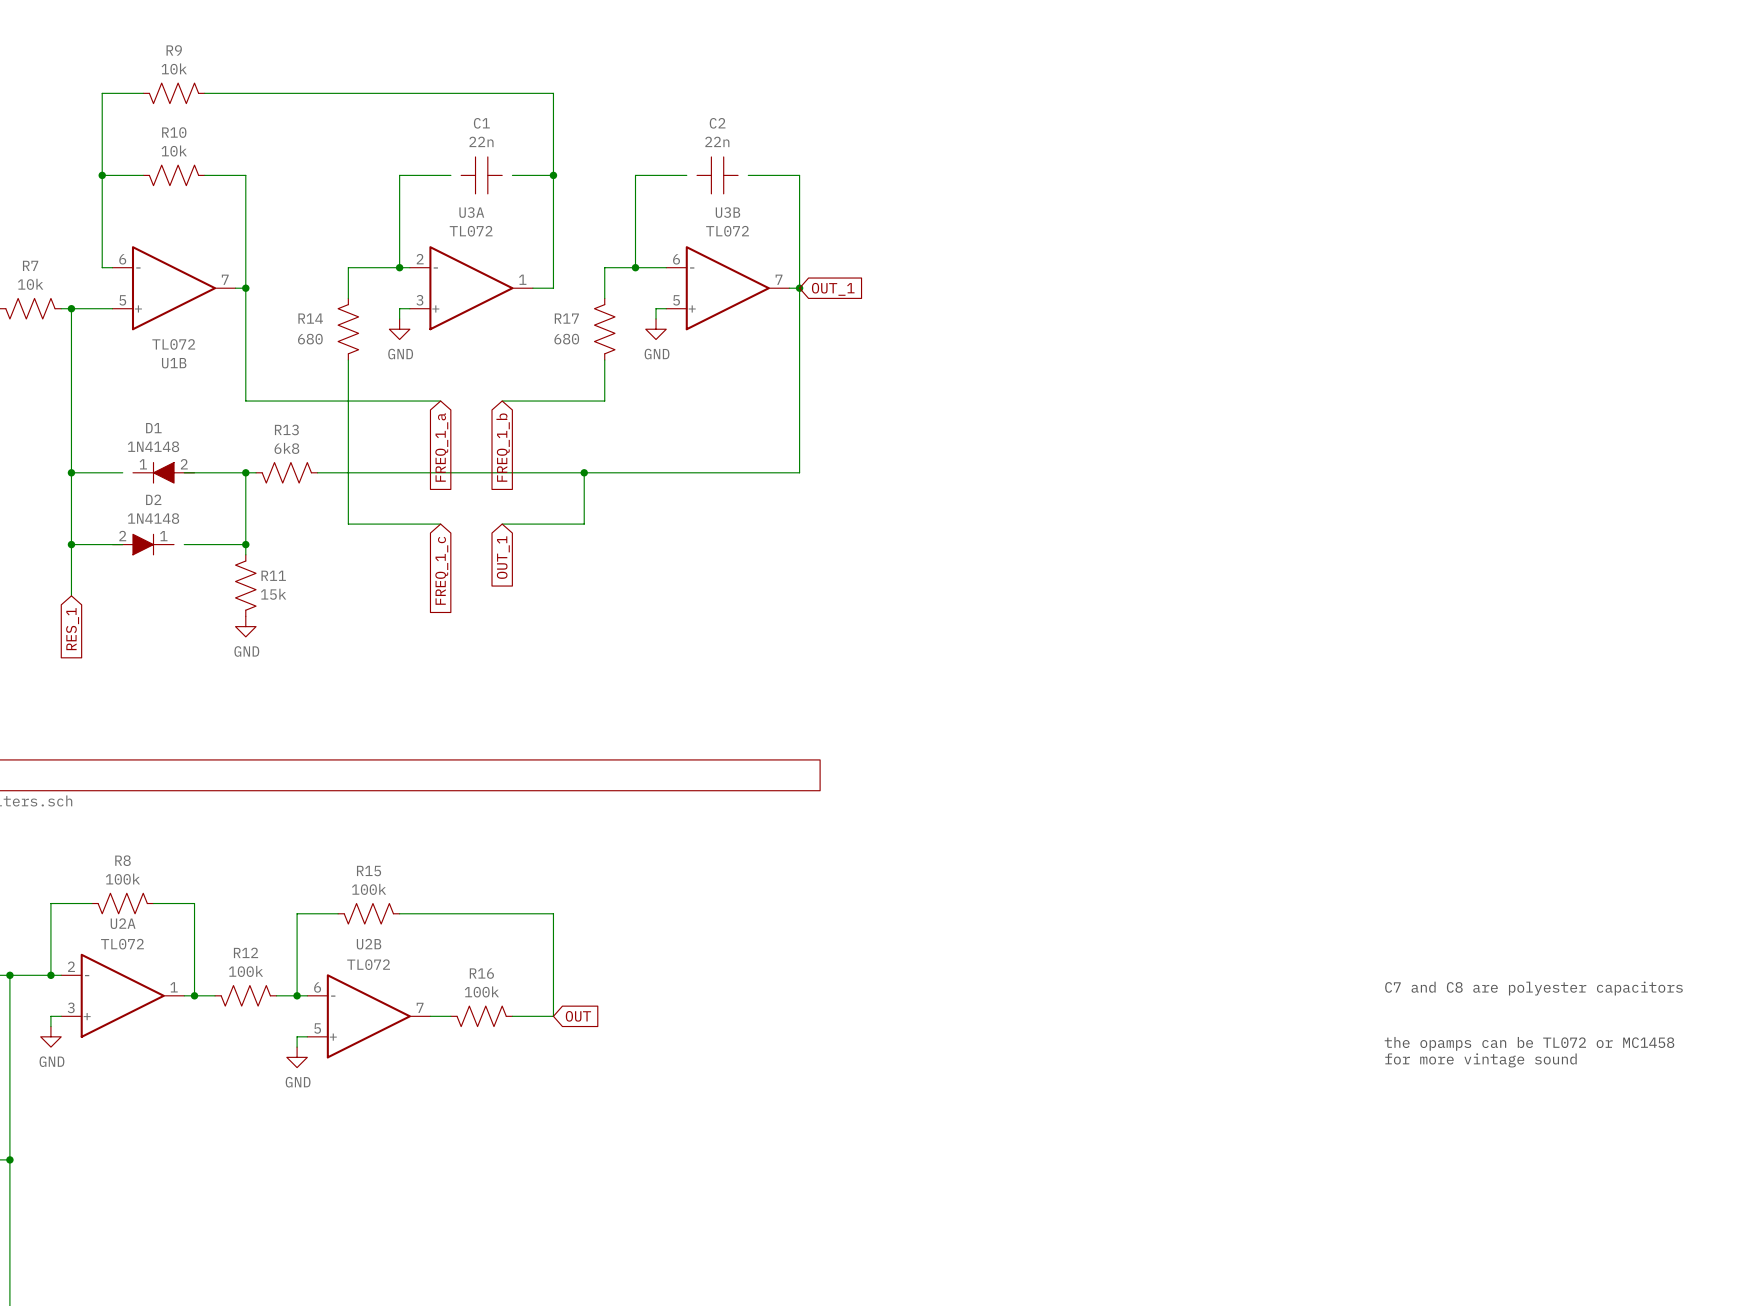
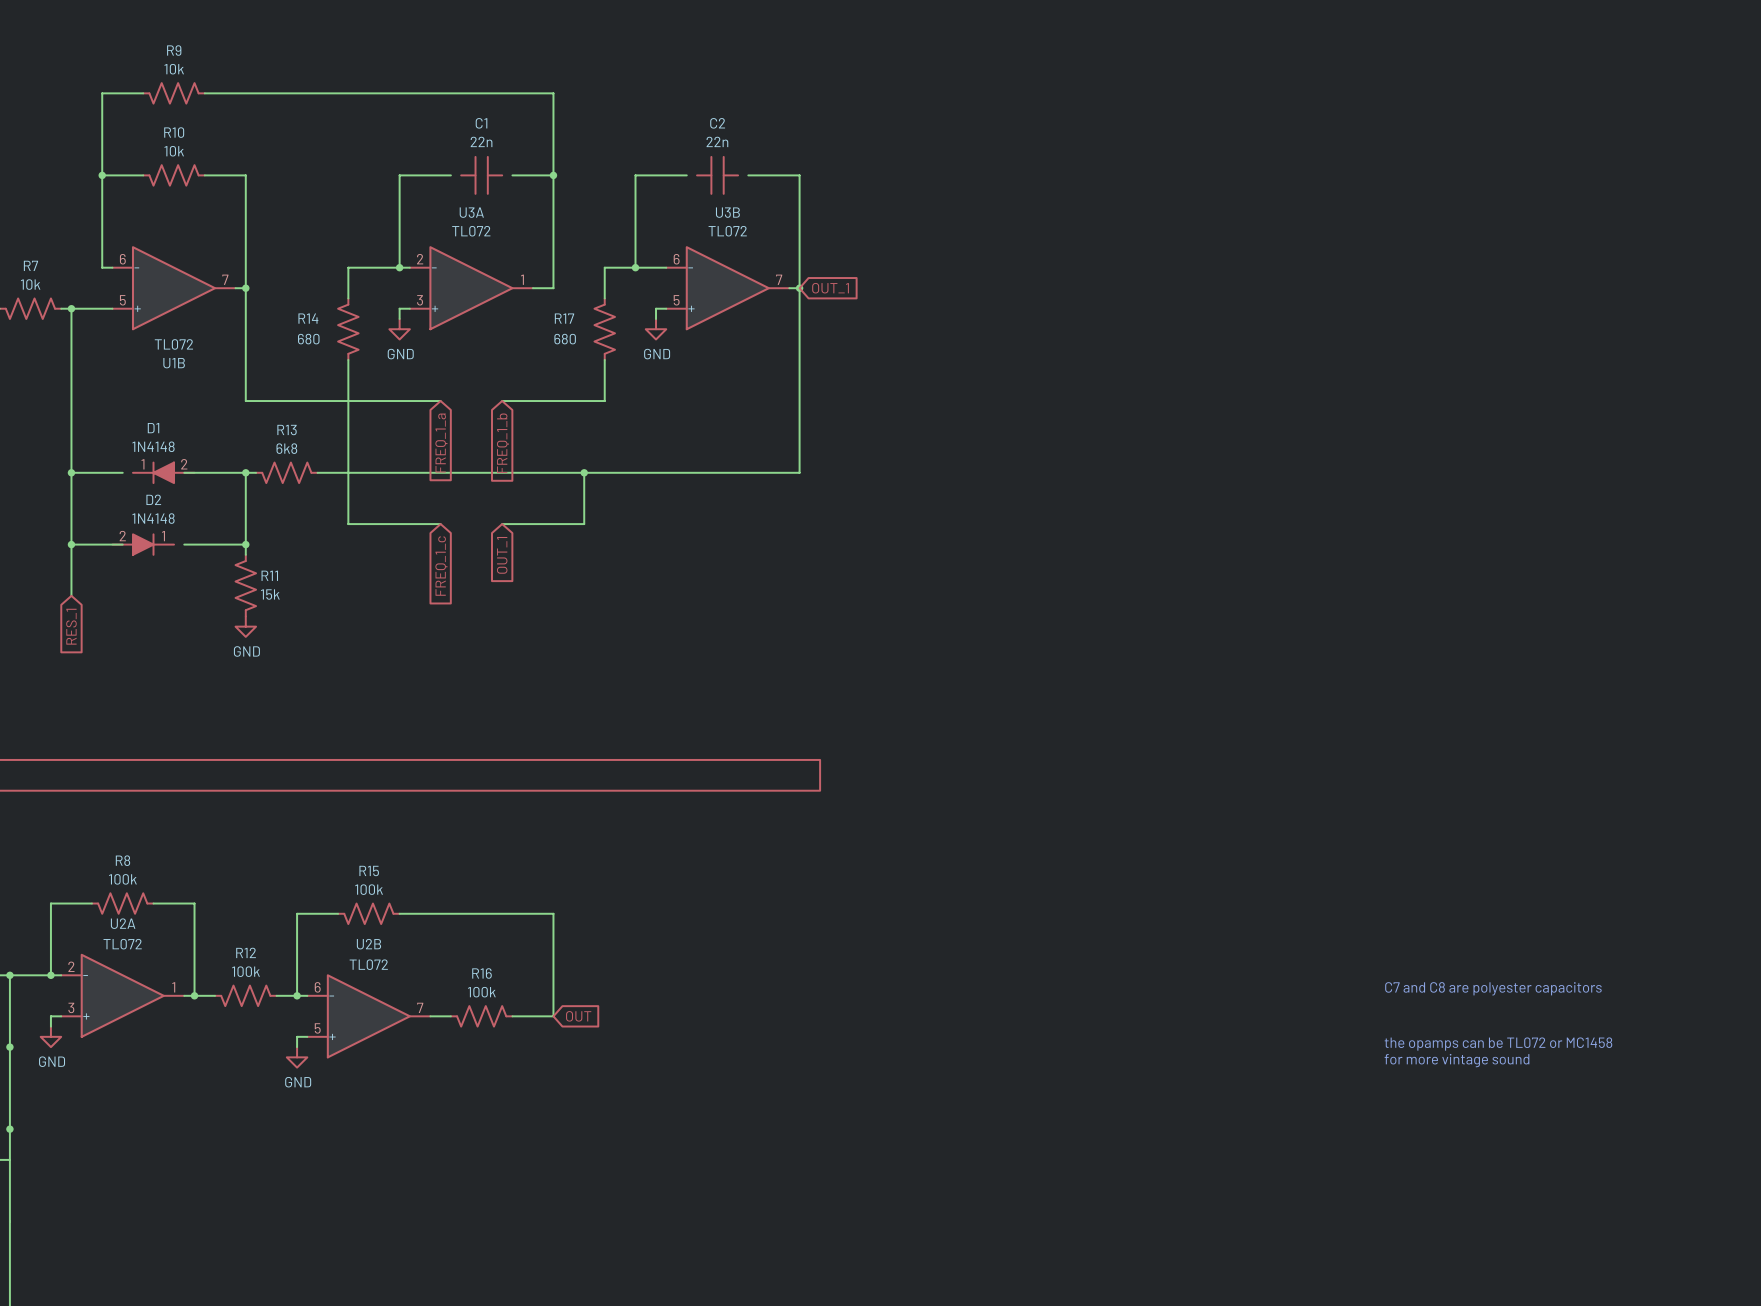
junction: none -> (9, 1047)
junction position: (9, 1159) -> (9, 1129)

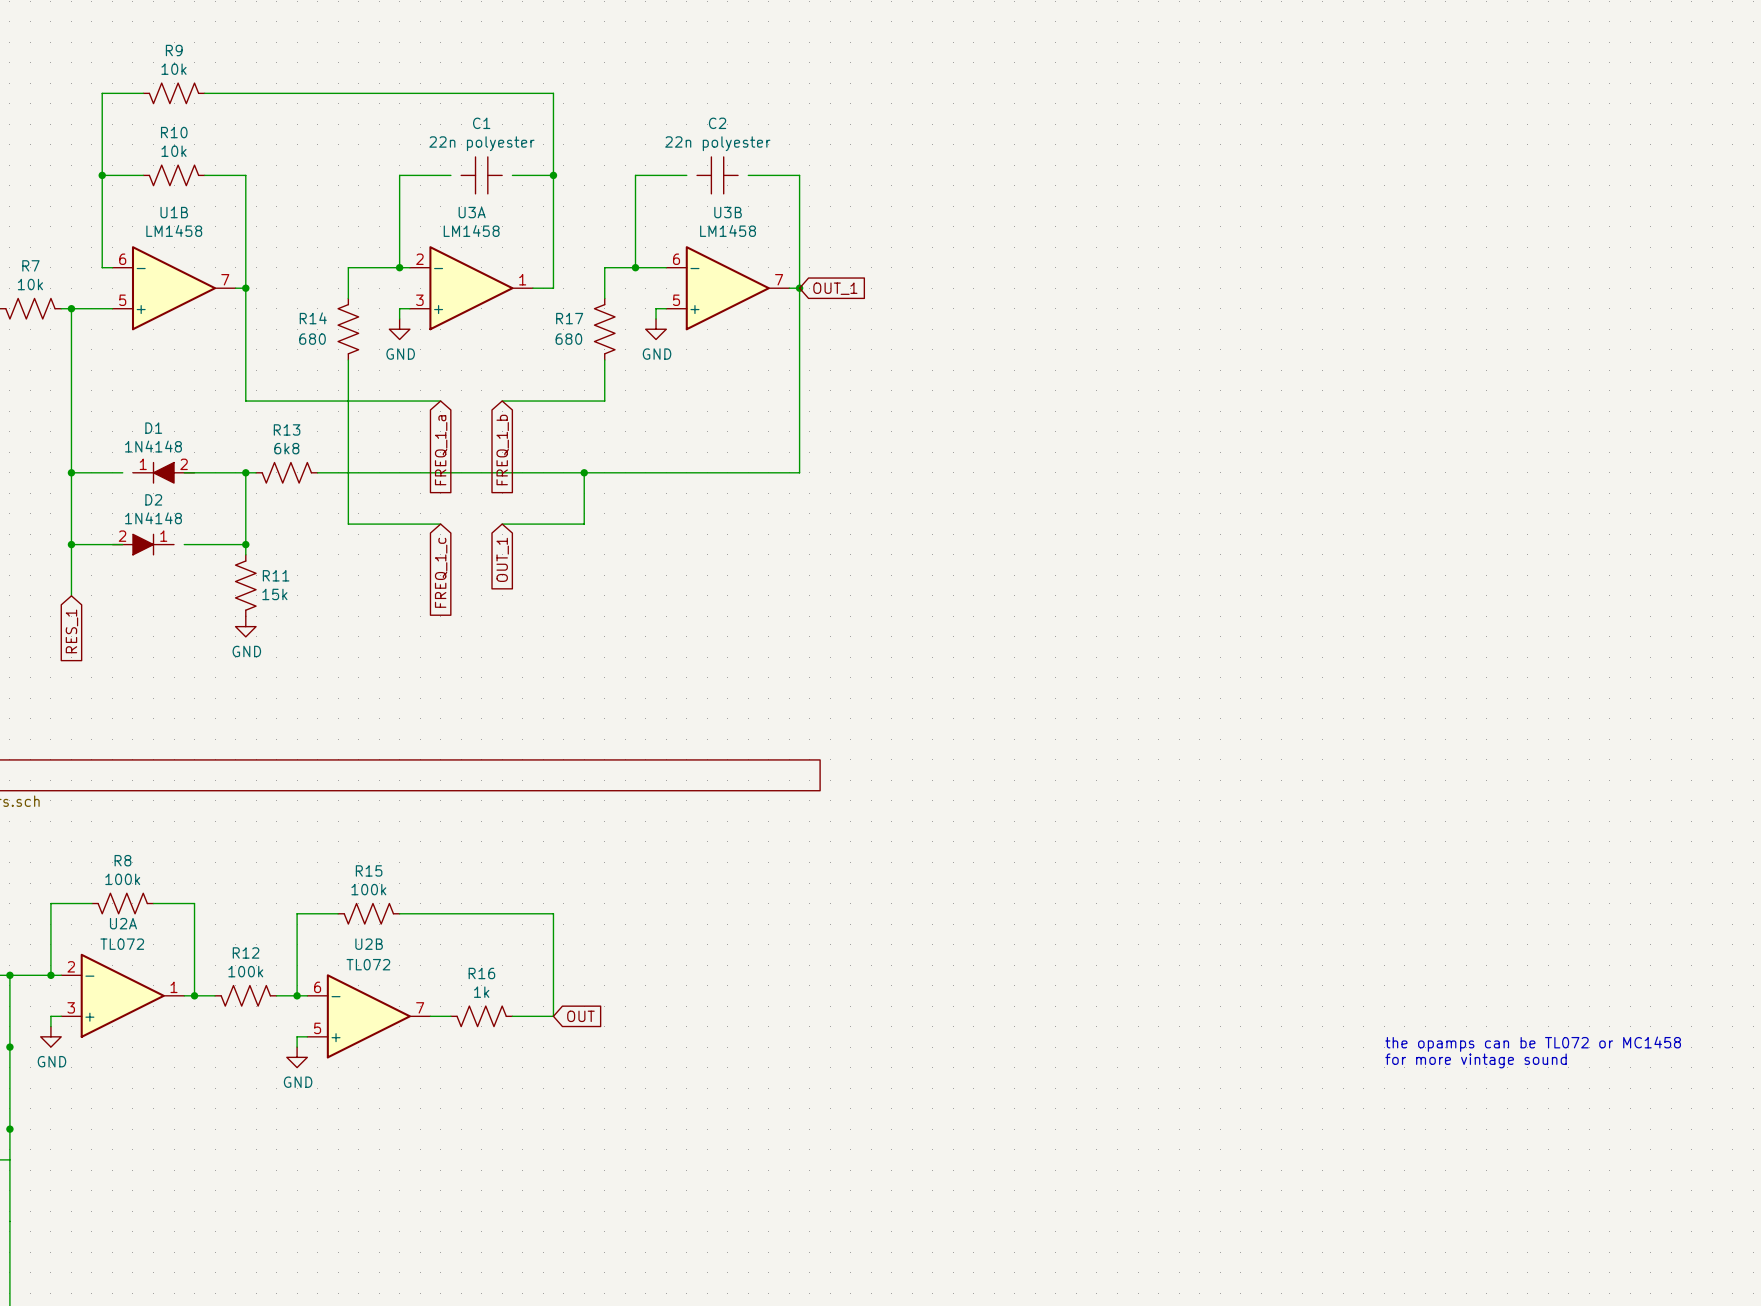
C1 value: 22n (481, 141) -> 22n polyester (481, 143)
C2 value: 22n (717, 141) -> 22n polyester (717, 143)
U3A value: TL072 (471, 231) -> LM1458 (471, 230)
U3B value: TL072 (727, 231) -> LM1458 (728, 230)
U1B value: TL072 (173, 344) -> LM1458 (174, 230)
U1B name position: U1B (174, 363) -> U1B (174, 212)
text: C7 and C8 are polyester capacitors (1493, 988) -> none
R16 value: 100k (481, 992) -> 1k (481, 992)

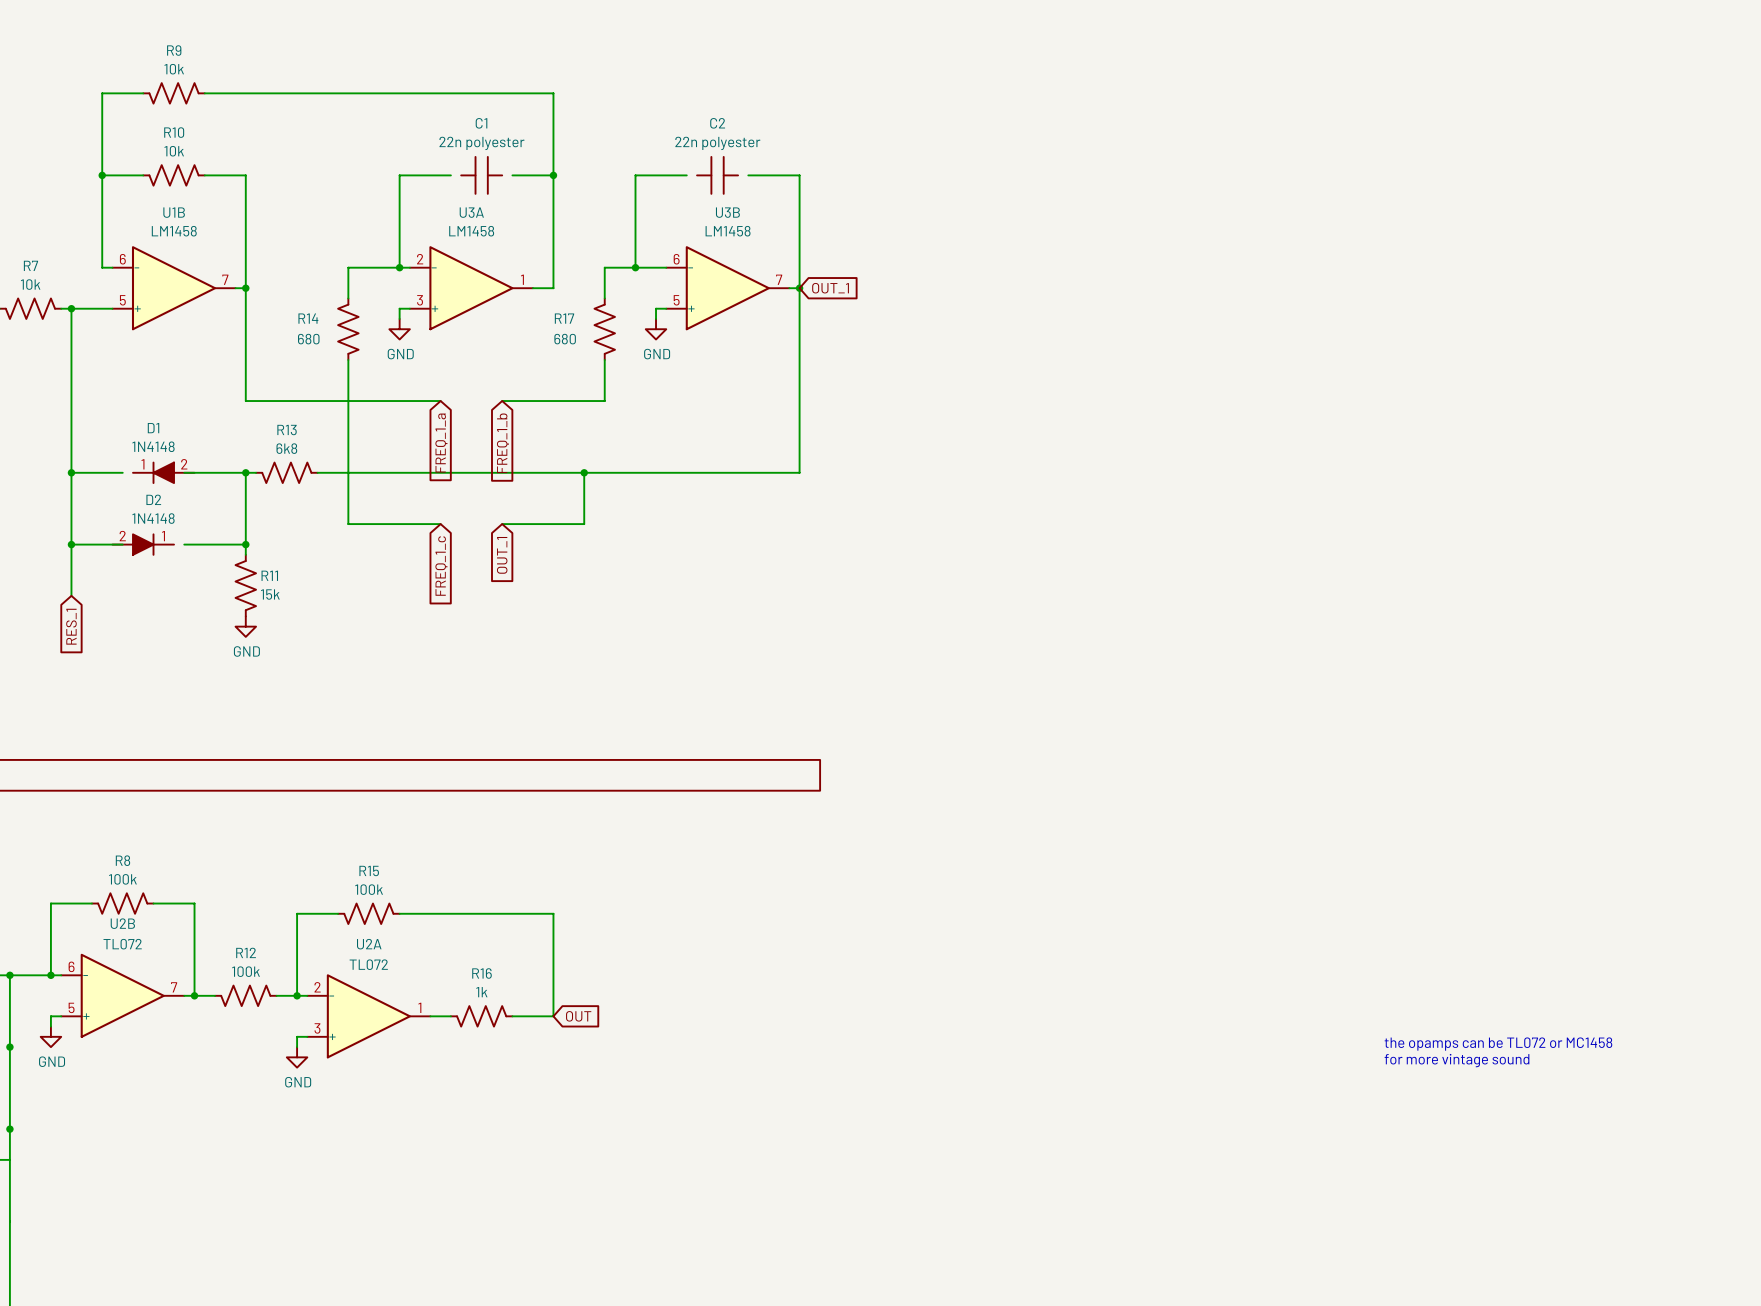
U2A position: (122, 995) -> (368, 1016)
U2B position: (368, 1016) -> (122, 995)

